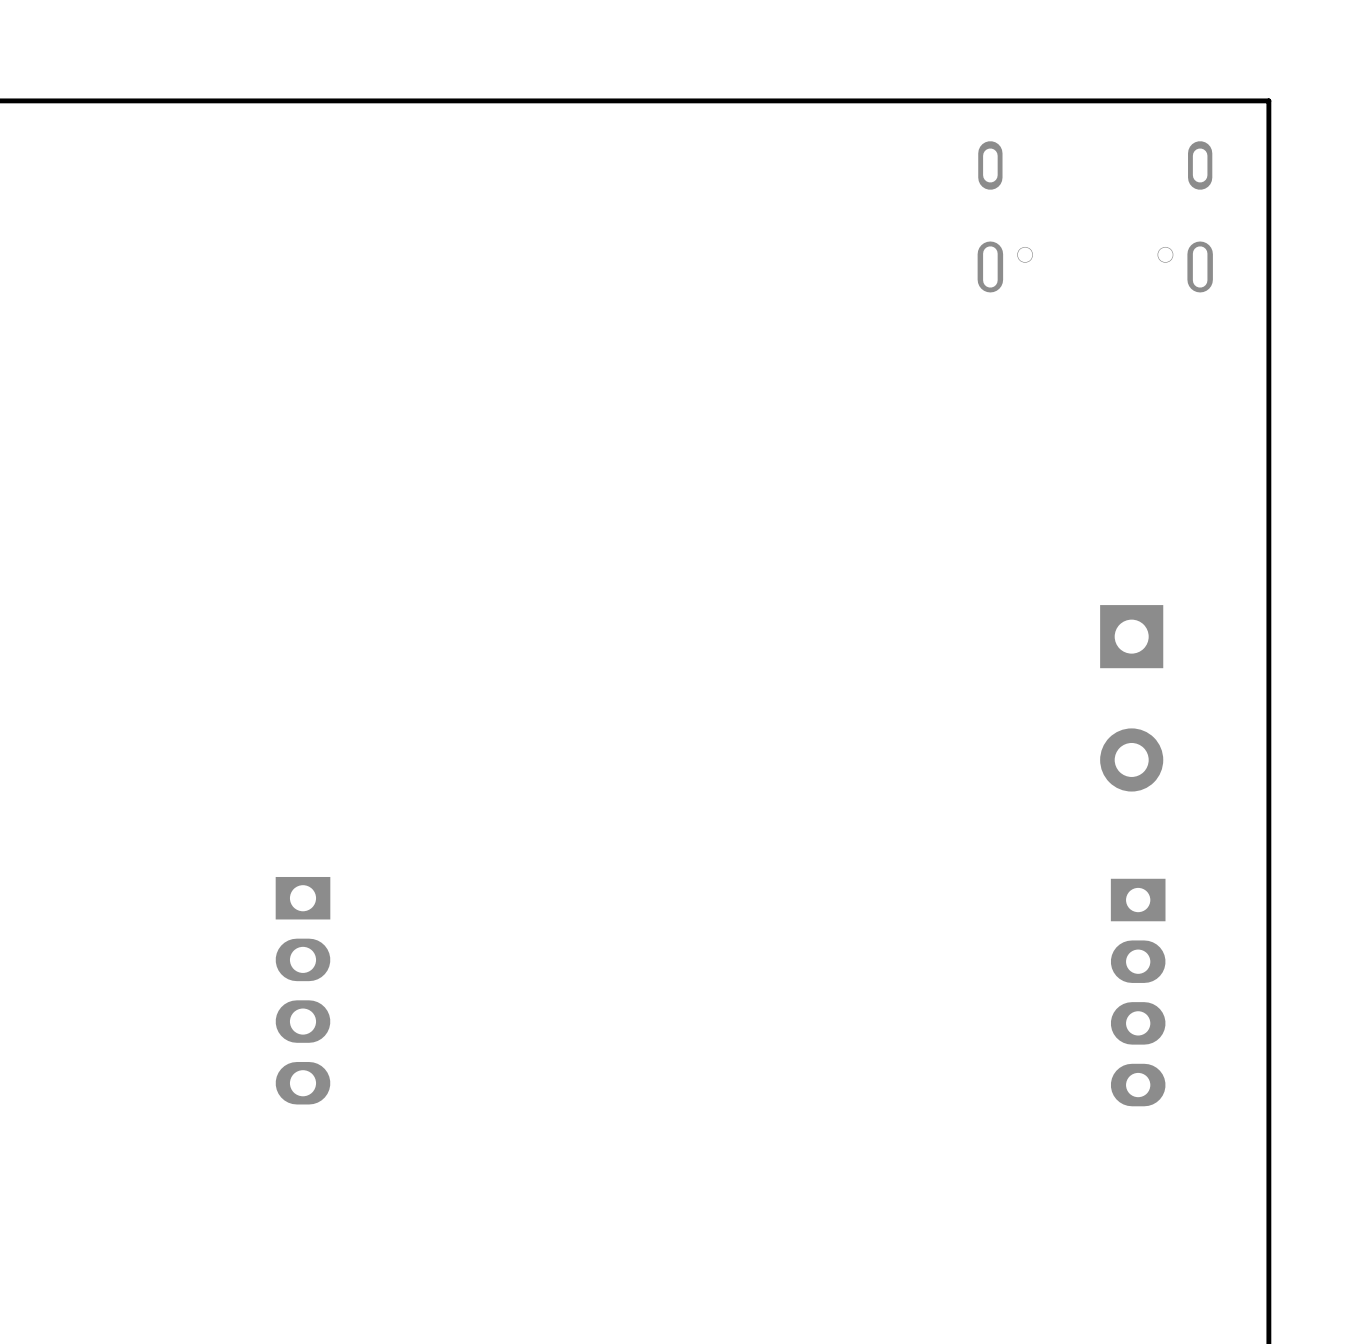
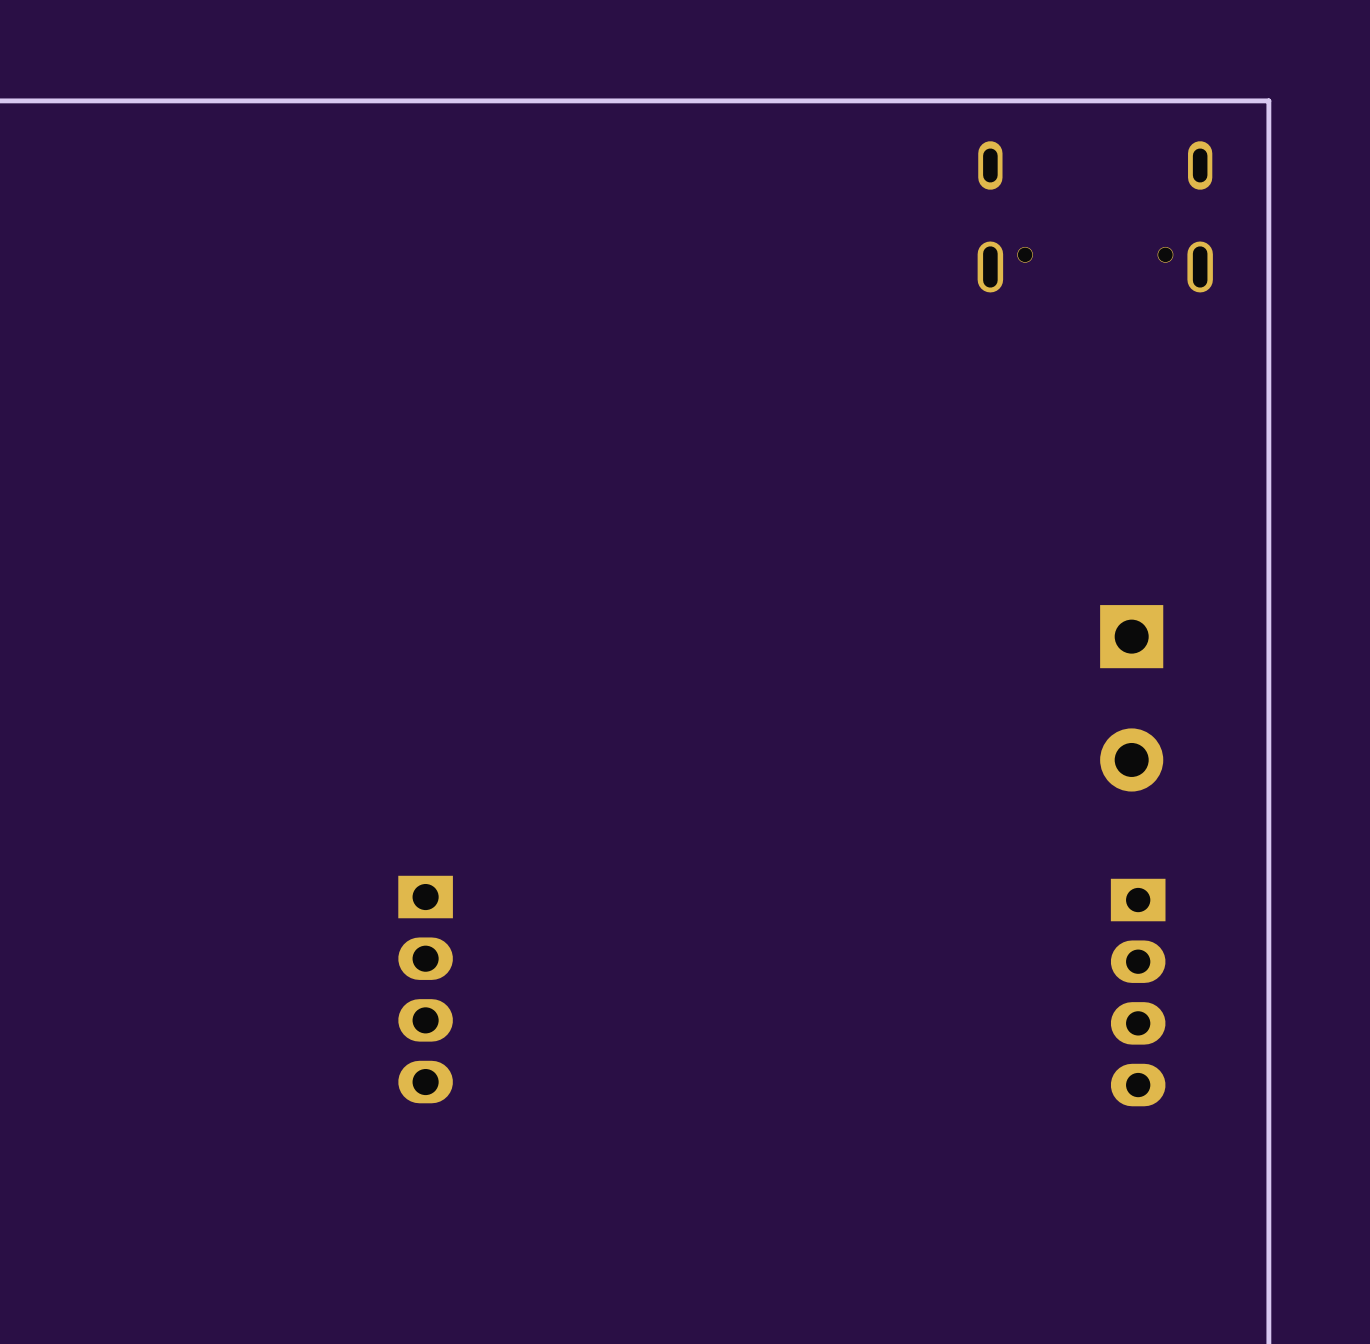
part position: (303, 990) -> (425, 989)

